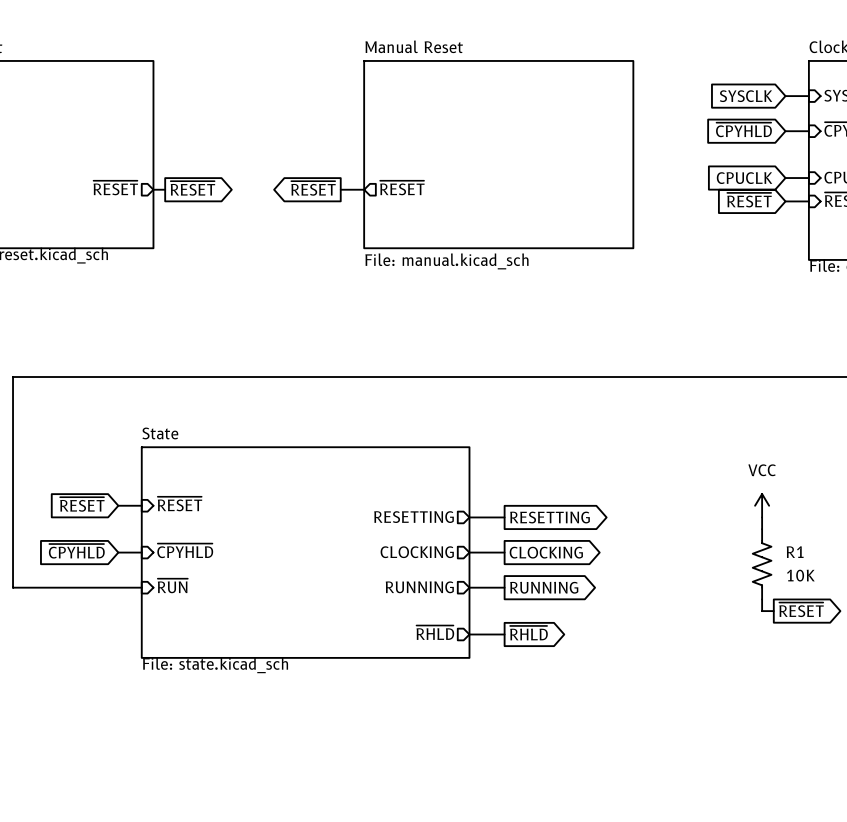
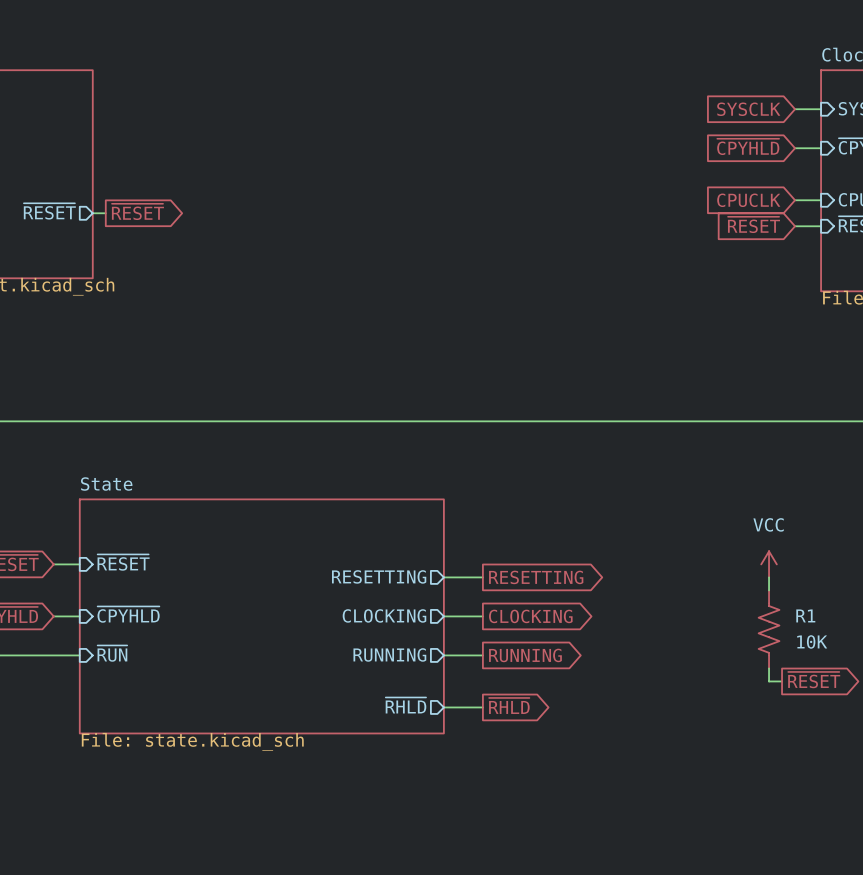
sheet Manual Reset: File: manual.kicad_sch (498, 154) -> none
global label: ~{RESET} (313, 188) -> none
sheet pin: ~{RESET} (402, 188) -> none
wire: (340, 189) (364, 189) -> none

